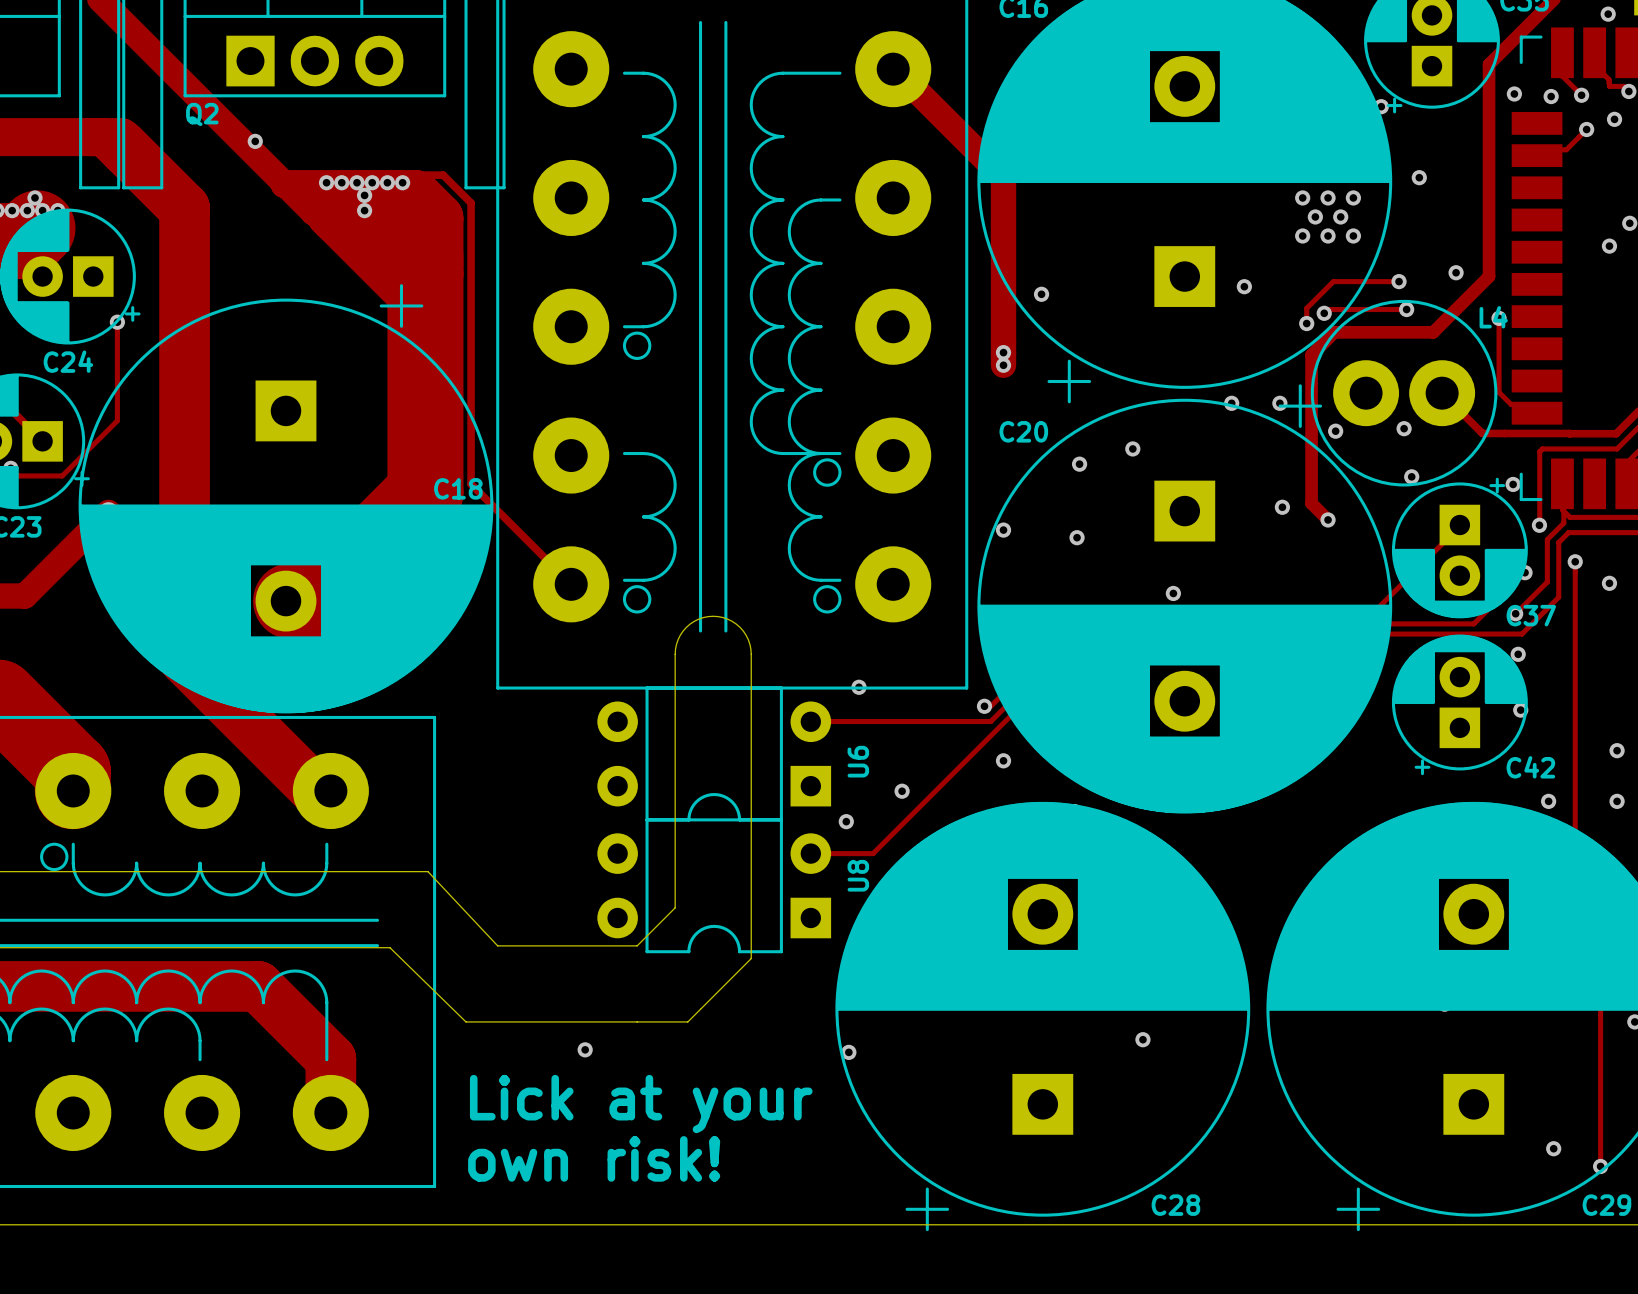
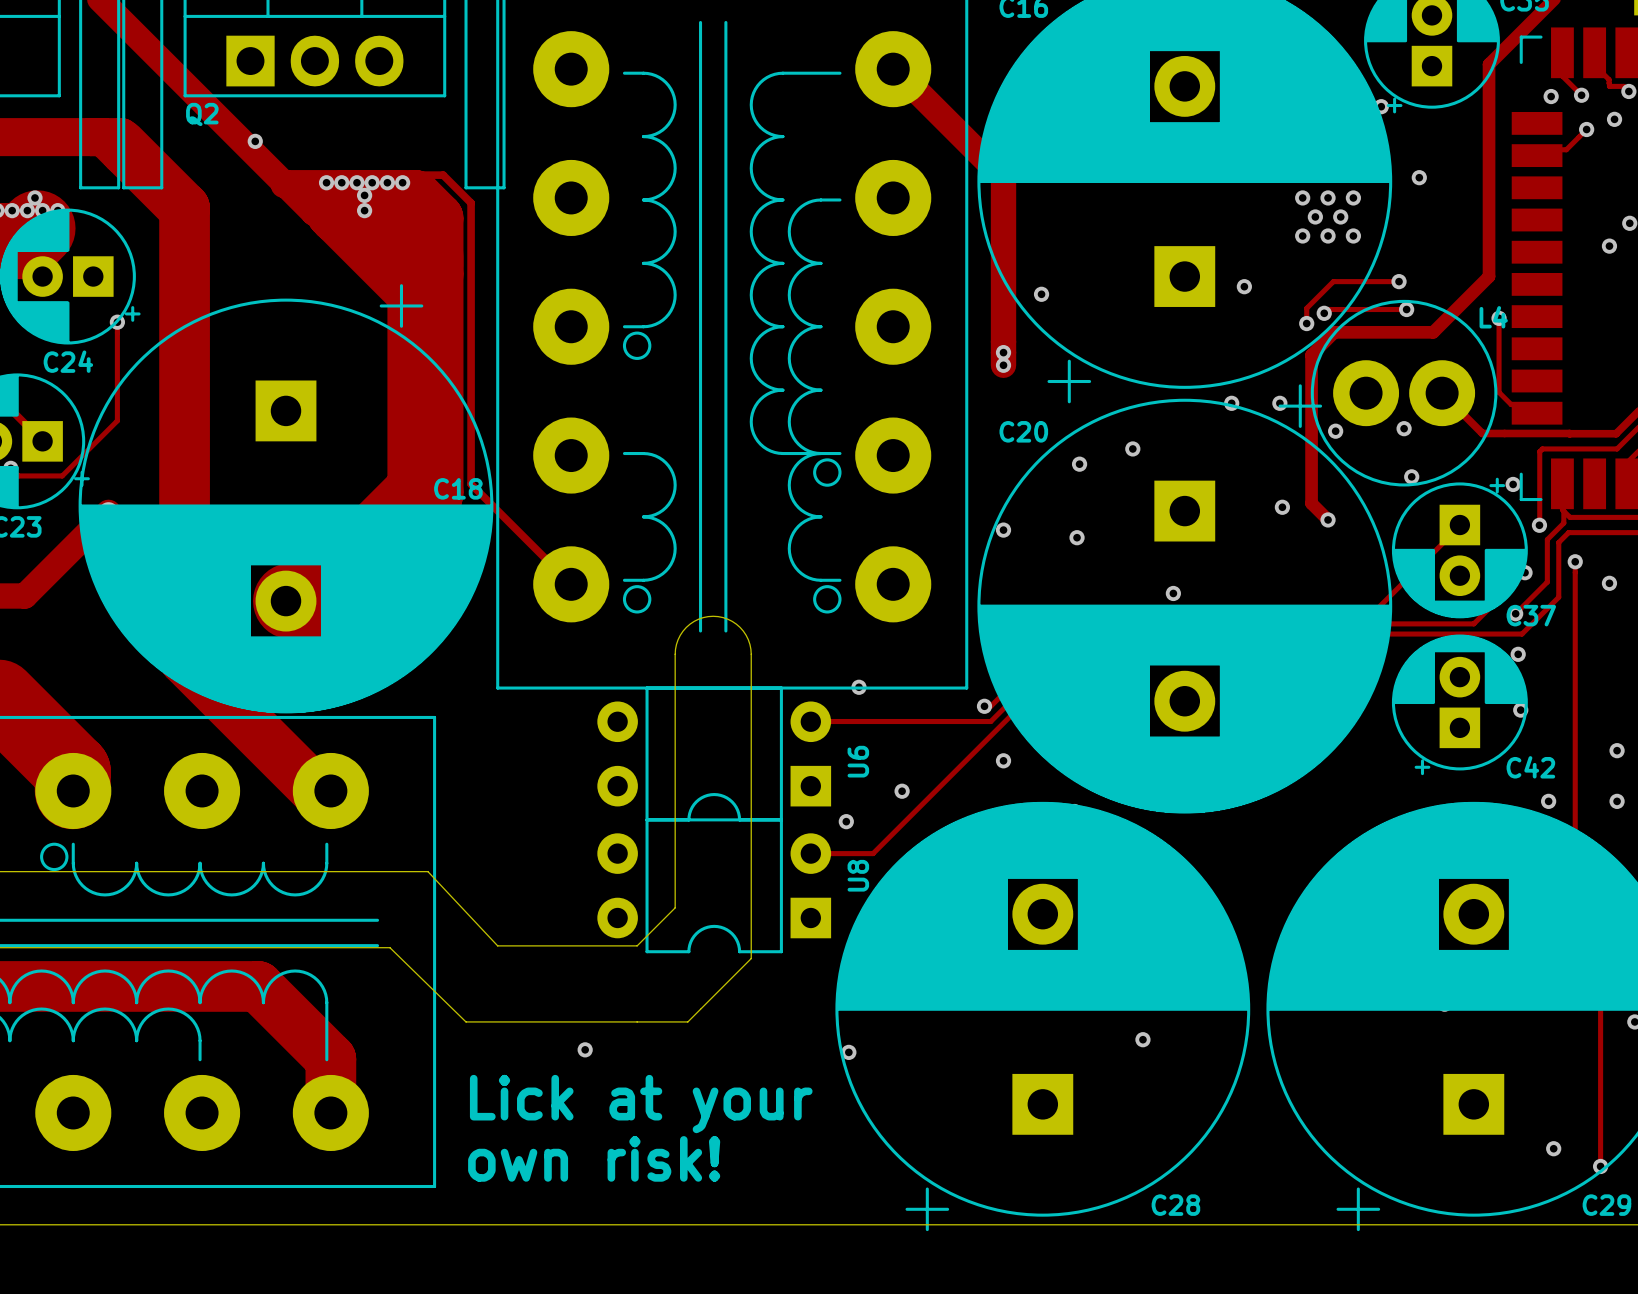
via: (1608, 14) -> none
via: (1514, 94) -> none
via: (1456, 272) -> none

